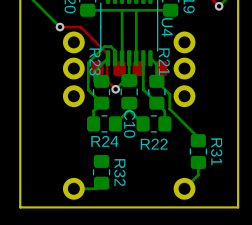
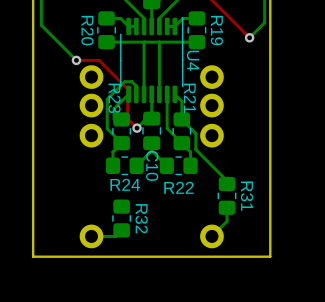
part: (108, 68) -> none
part: (149, 68) -> none

